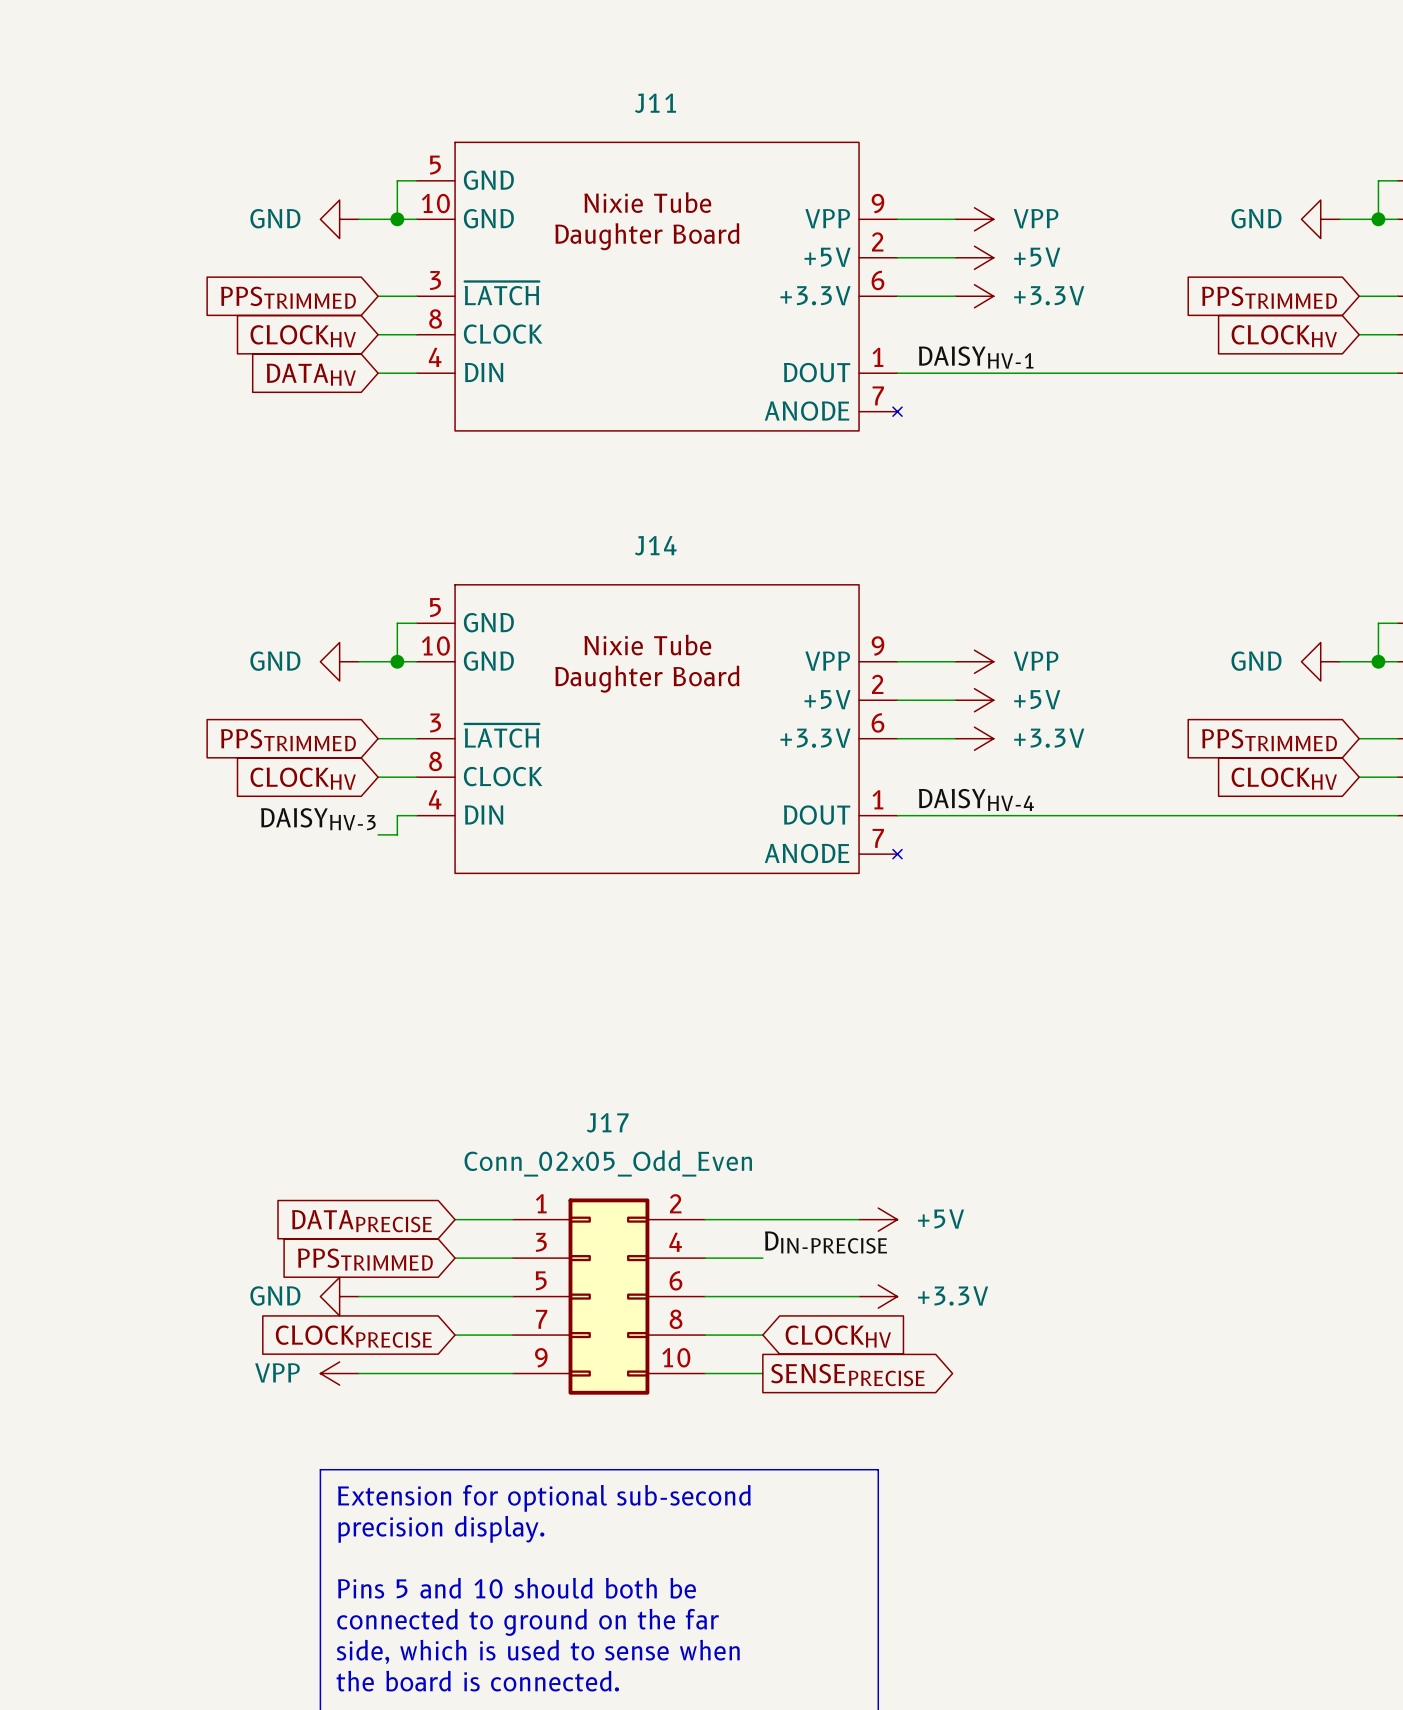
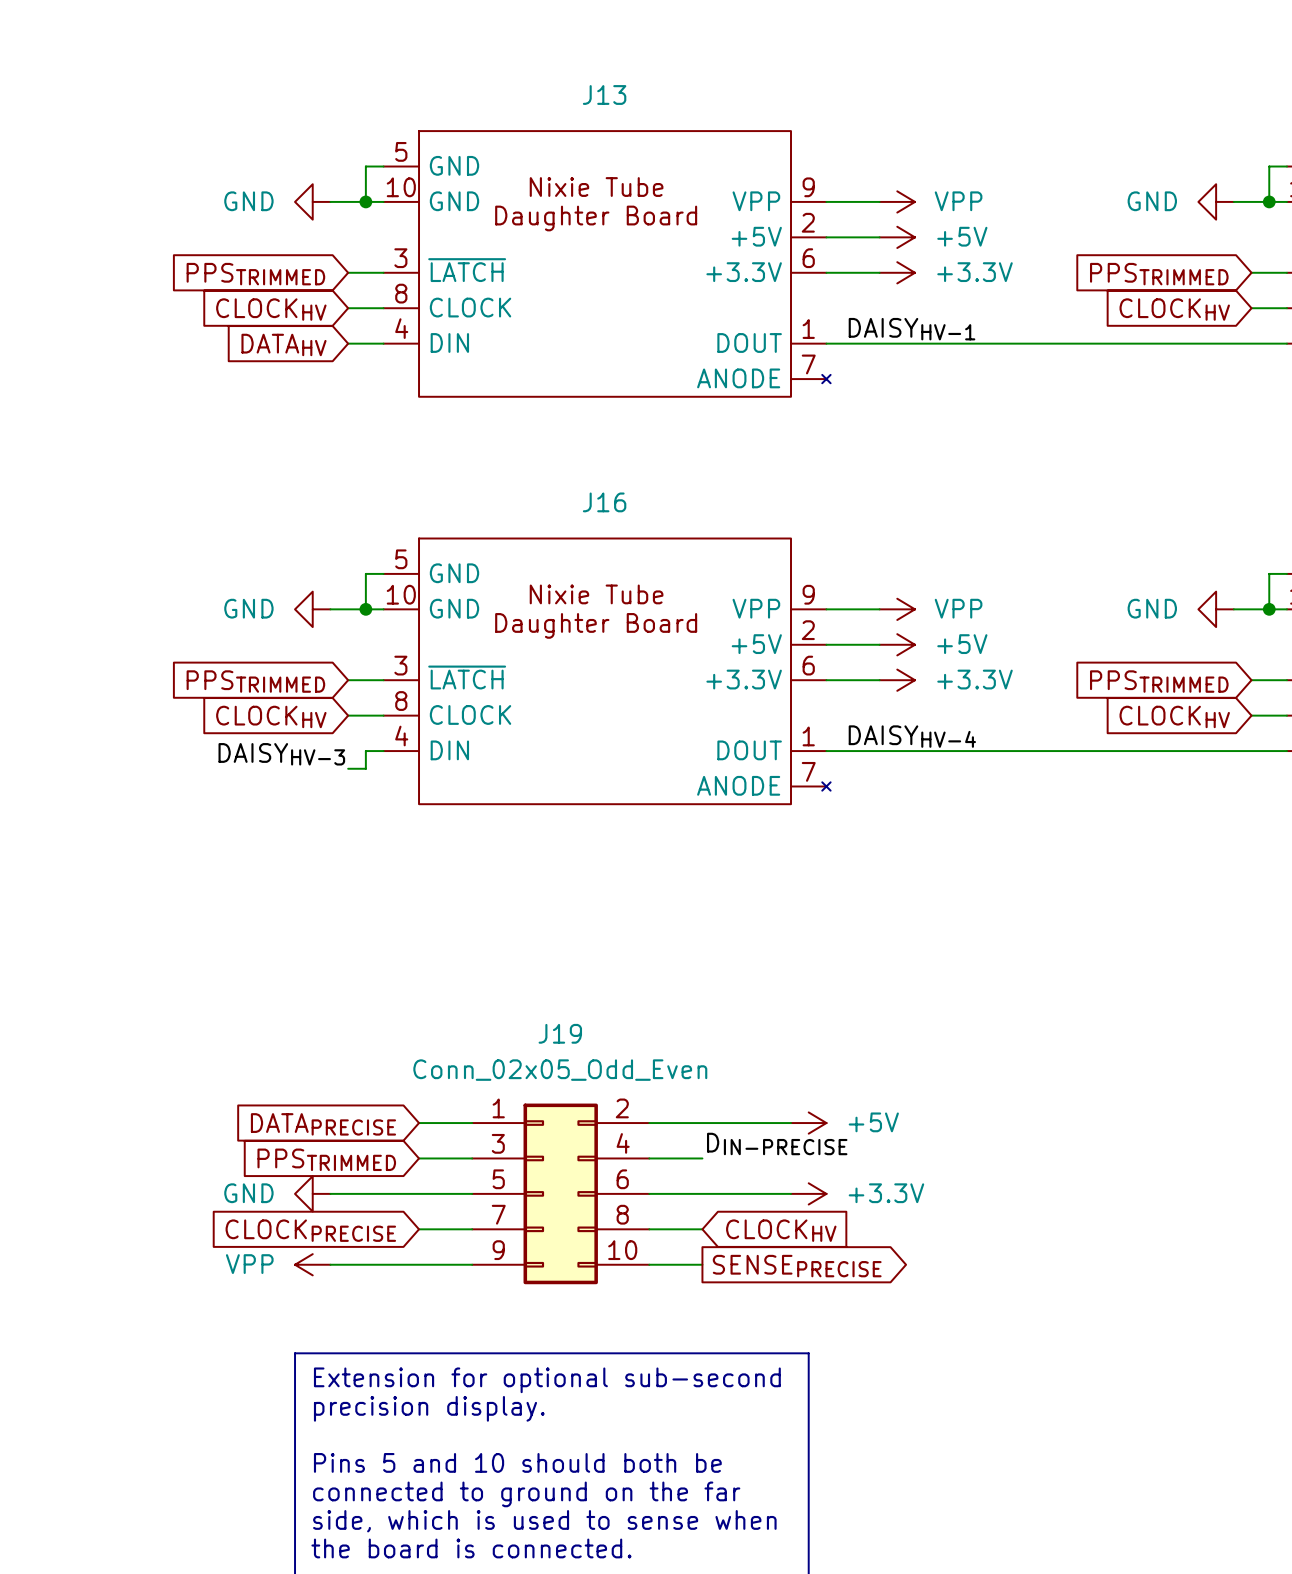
J11 name: J11 (655, 103) -> J13 (604, 94)
J14 name: J14 (655, 545) -> J16 (604, 502)
J17 name: J17 (607, 1122) -> J19 (560, 1033)

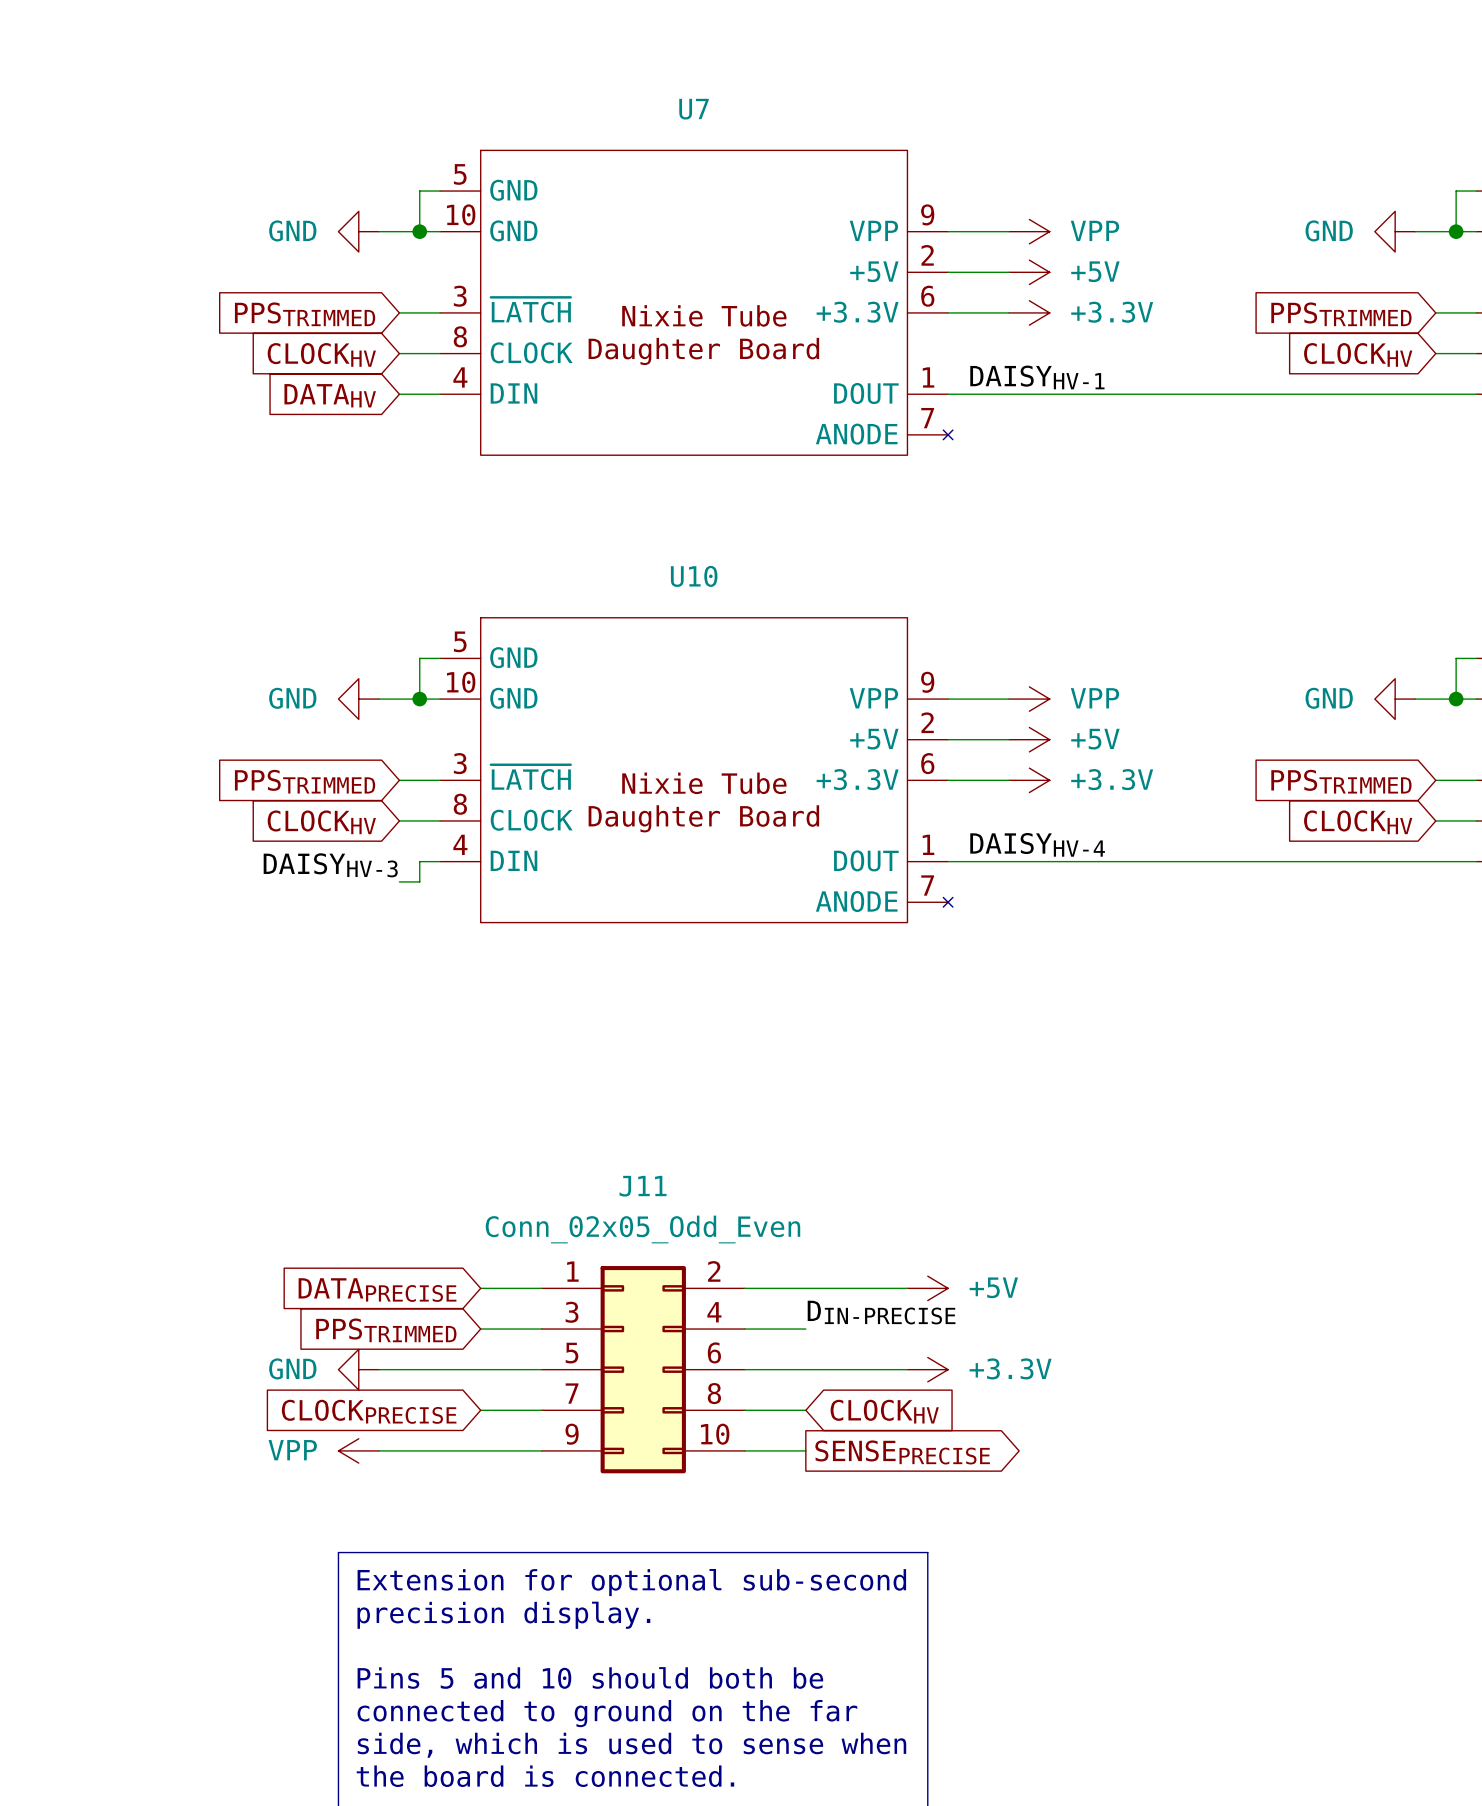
J13 name: J13 (604, 94) -> U7 (694, 109)
J13 text position: Nixie Tube (596, 187) -> Nixie Tube (704, 315)
J13 text position: Daughter Board (596, 218) -> Daughter Board (703, 351)
J16 name: J16 (604, 502) -> U10 (694, 576)
J16 text position: Nixie Tube (596, 594) -> Nixie Tube (704, 783)
J16 text position: Daughter Board (596, 625) -> Daughter Board (703, 818)
J19 name: J19 (560, 1033) -> J11 (643, 1186)

